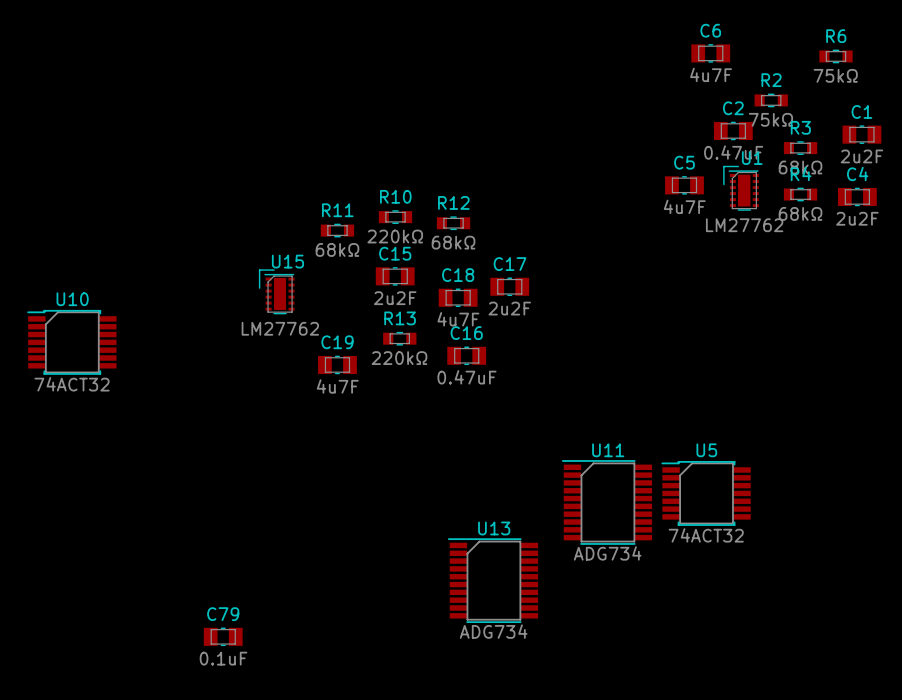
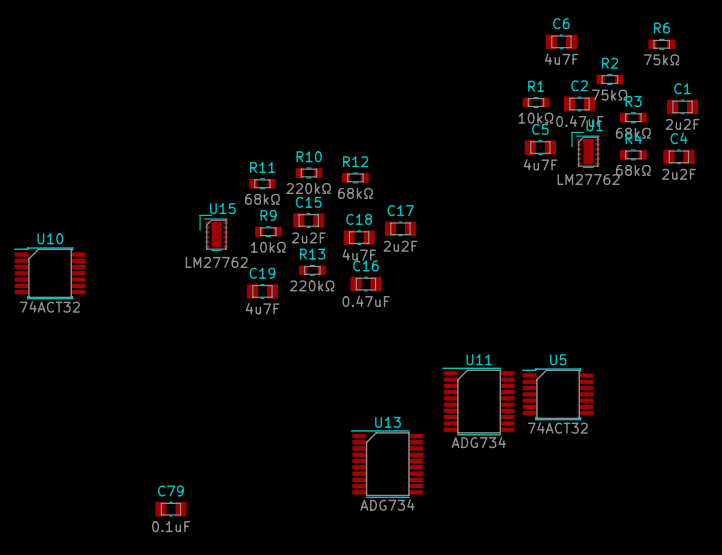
R1: none -> 10kΩ (535, 102)
R9: none -> 10kΩ (268, 231)

